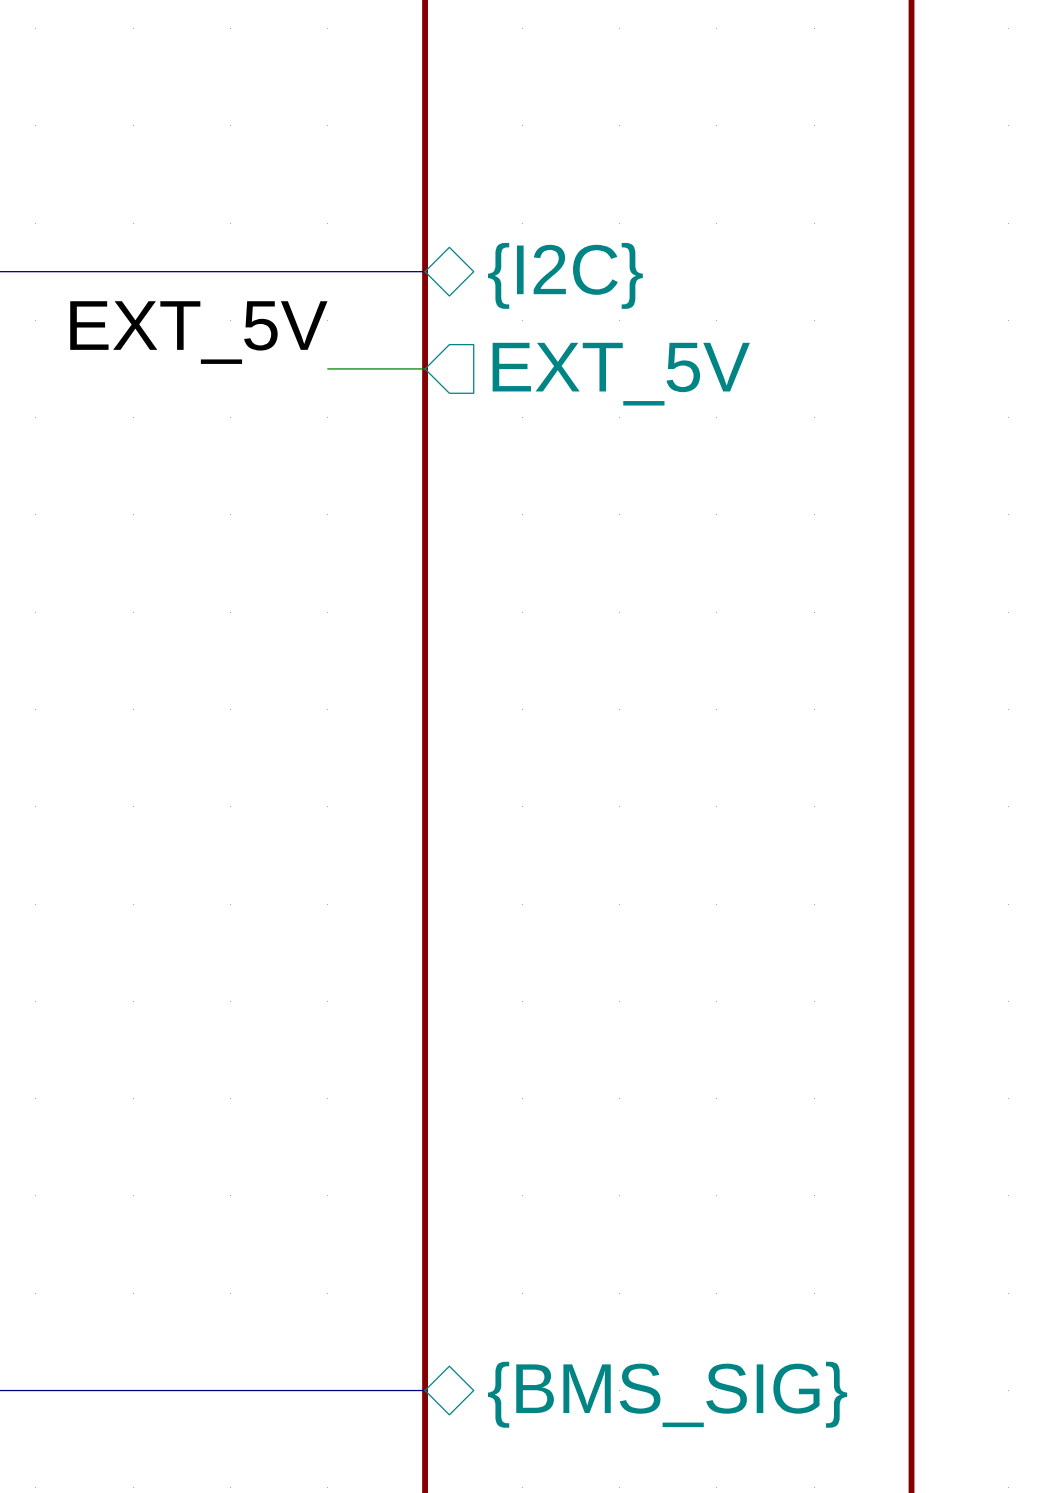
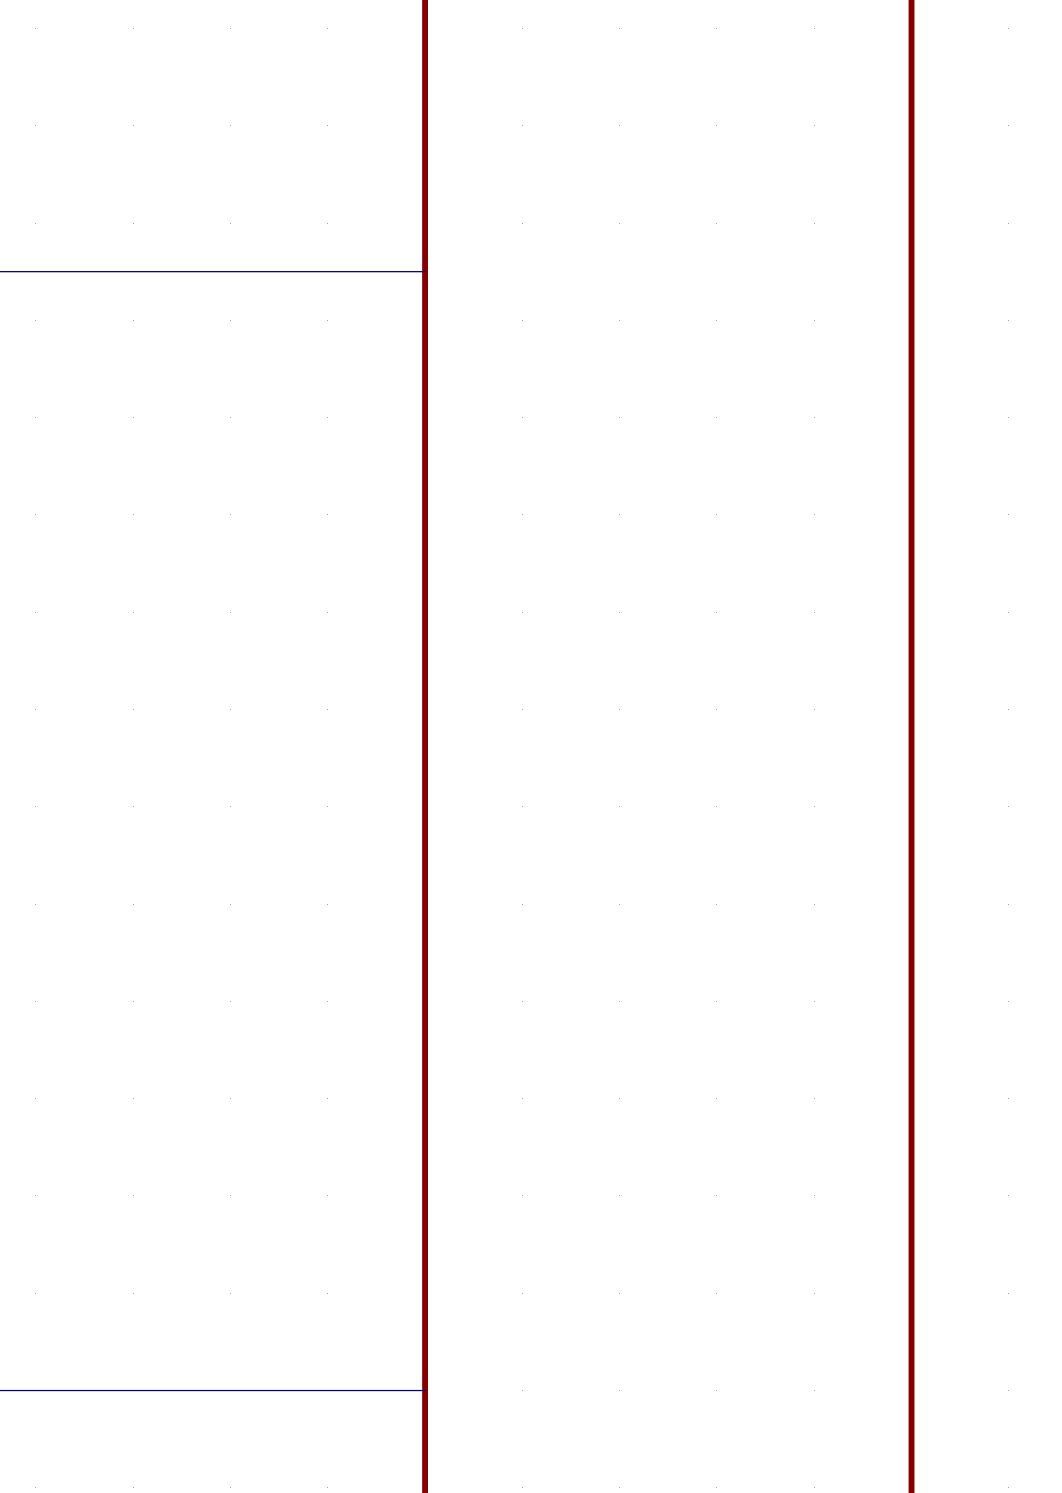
sheet pin: {I2C} (565, 275) -> none
label: EXT_5V (198, 332) -> none
wire: (327, 368) (425, 368) -> none
sheet pin: EXT_5V (621, 374) -> none
sheet pin: {BMS_SIG} (667, 1394) -> none

